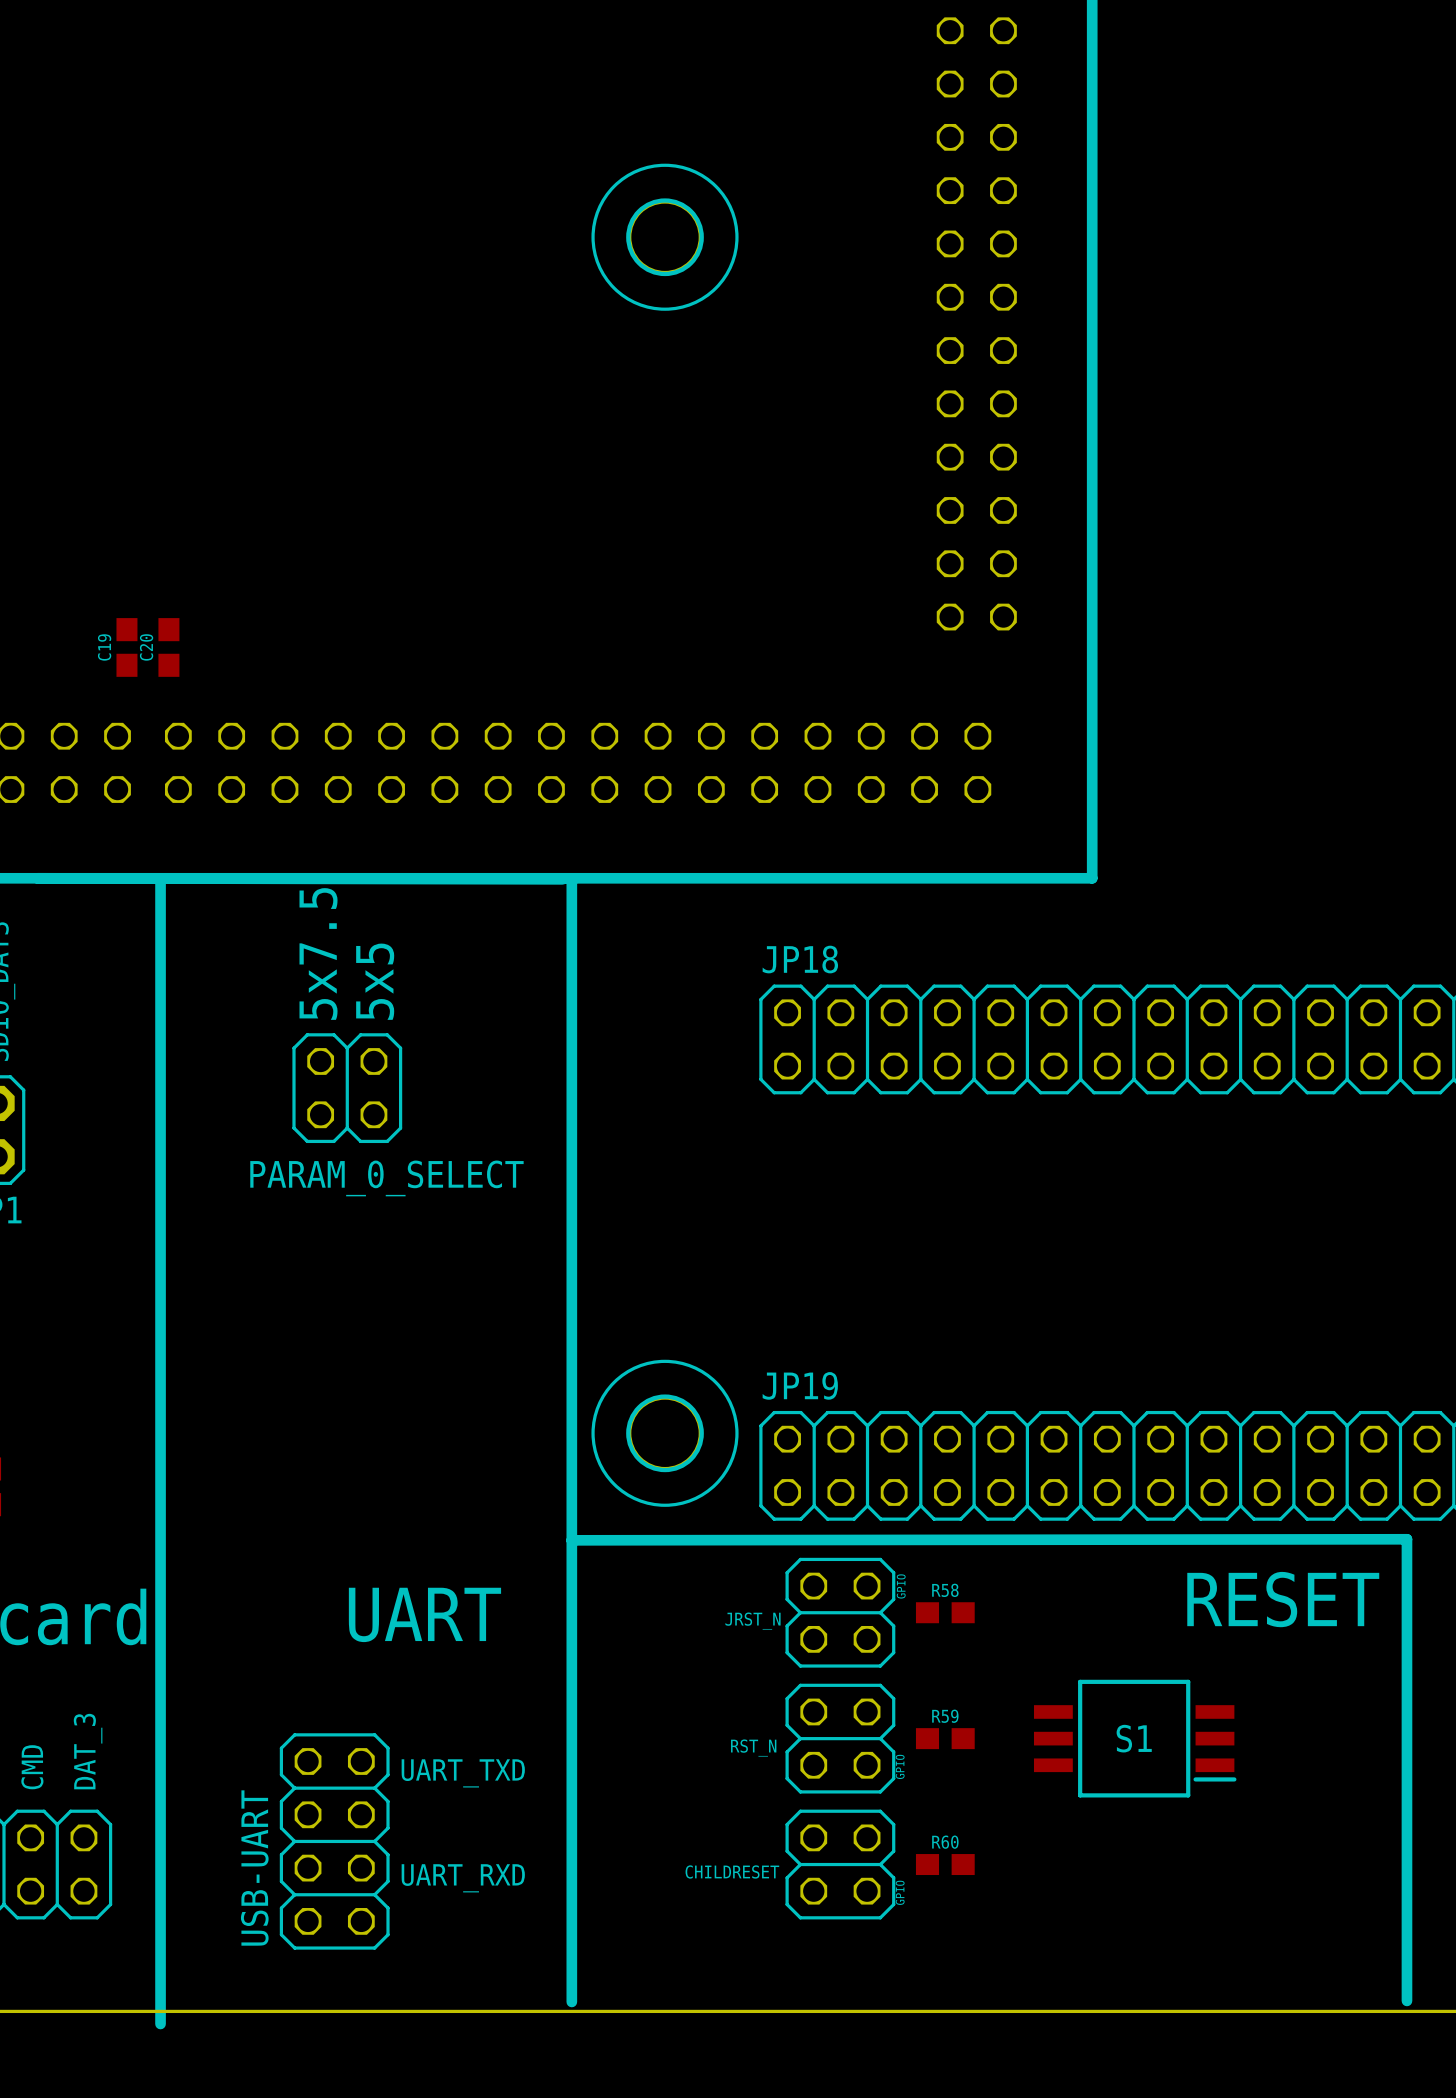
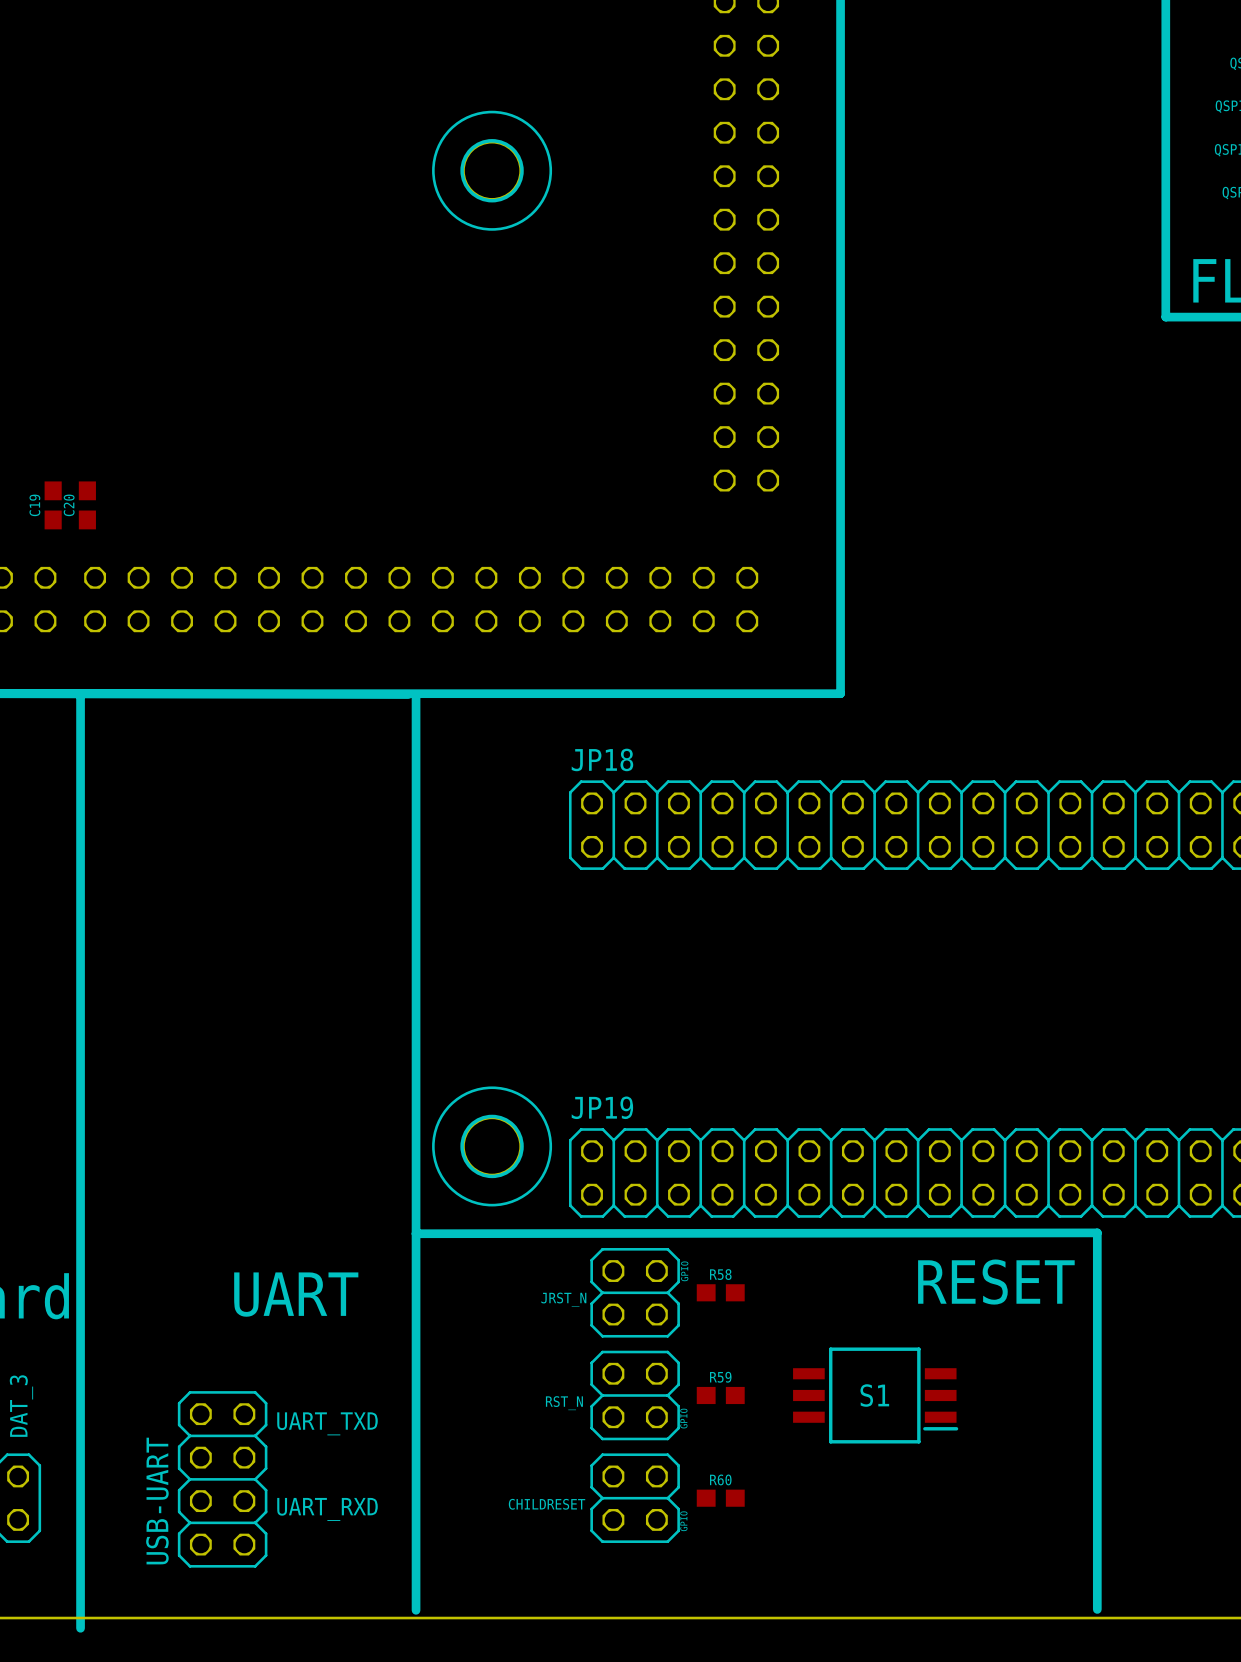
text: 5x7.5 (318, 953) -> none
text: 5x5 (375, 981) -> none
PARAM_0_SELECT: (347, 1088) -> none

